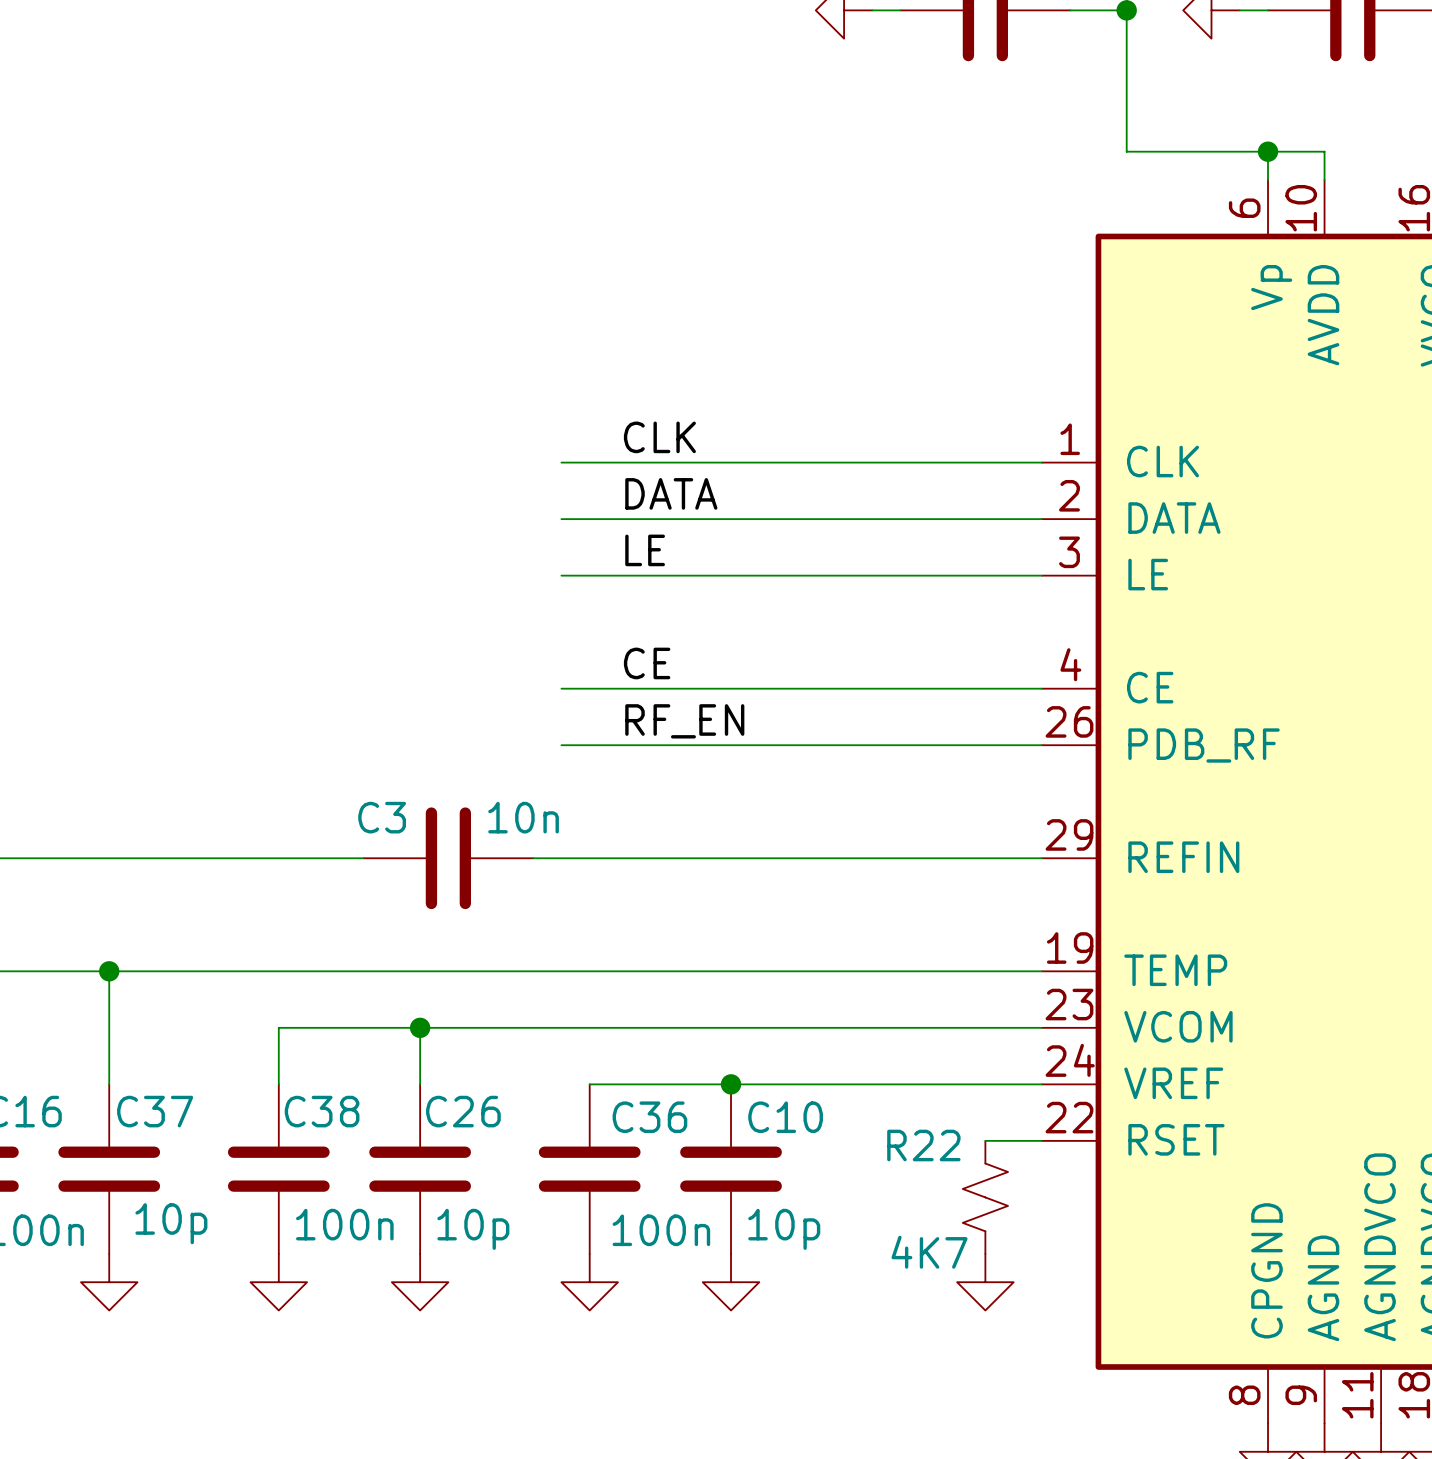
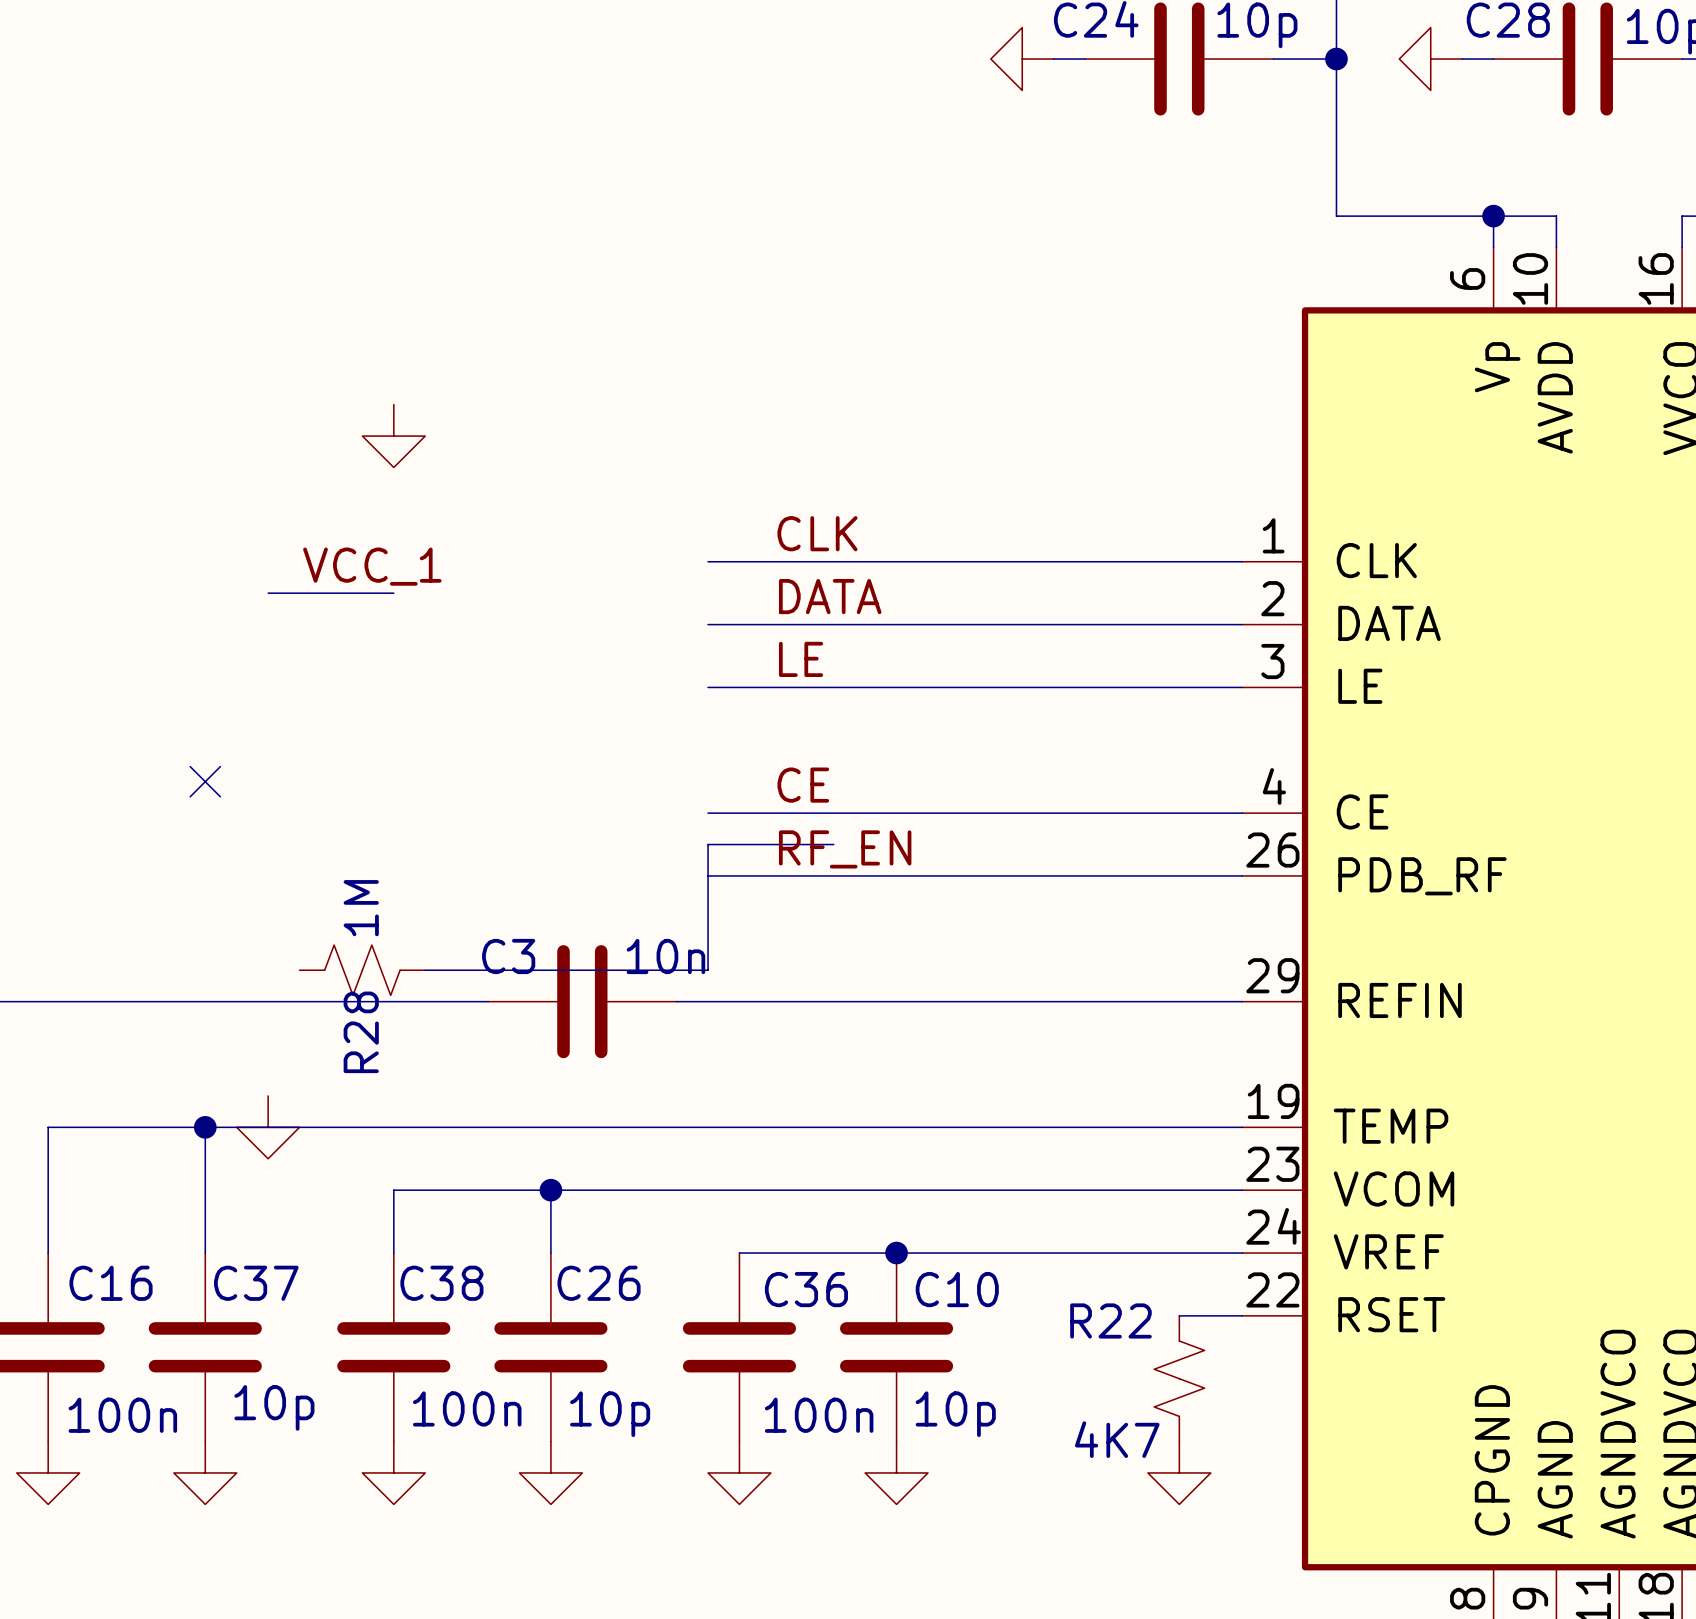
power symbol: none -> (393, 436)
label: none -> VCC_1 (372, 566)
wire: none -> (268, 593) (393, 593)
no-connect mark: none -> (205, 781)
wire: none -> (833, 844) (708, 844) (708, 970) (425, 970)
R28: none -> 1M (362, 970)
power symbol: none -> (268, 1127)

